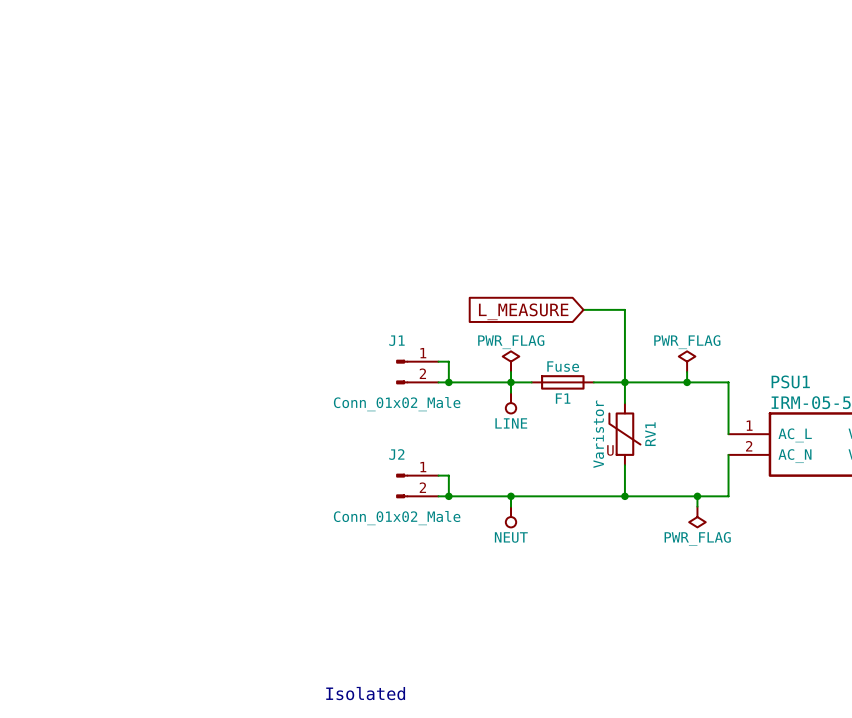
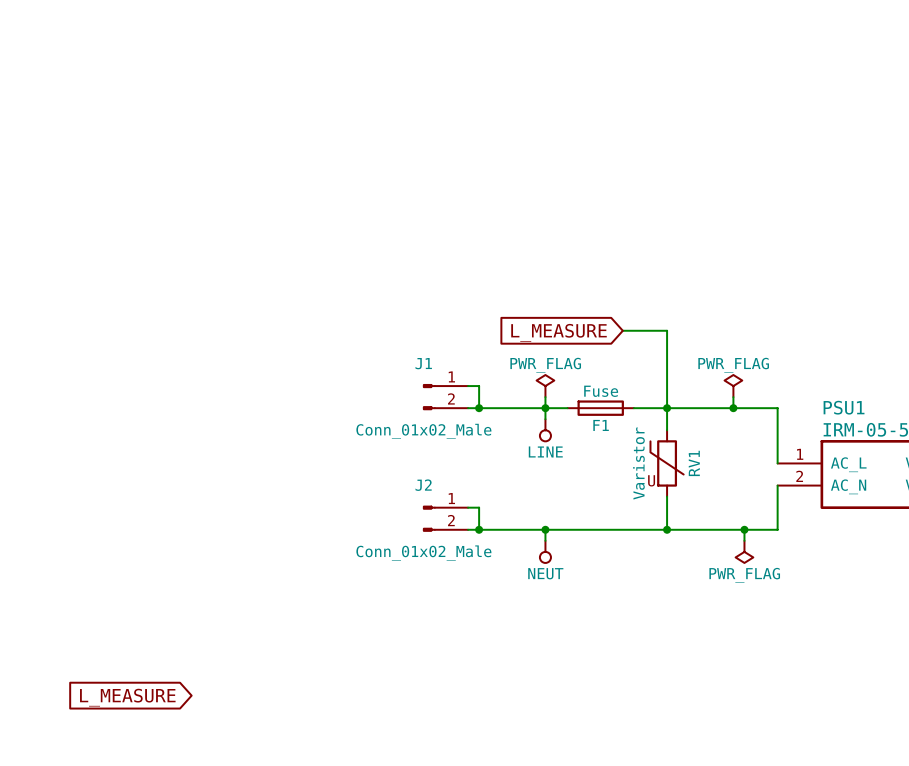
global label: none -> L_MEASURE (127, 697)
text: Isolated (365, 693) -> none

